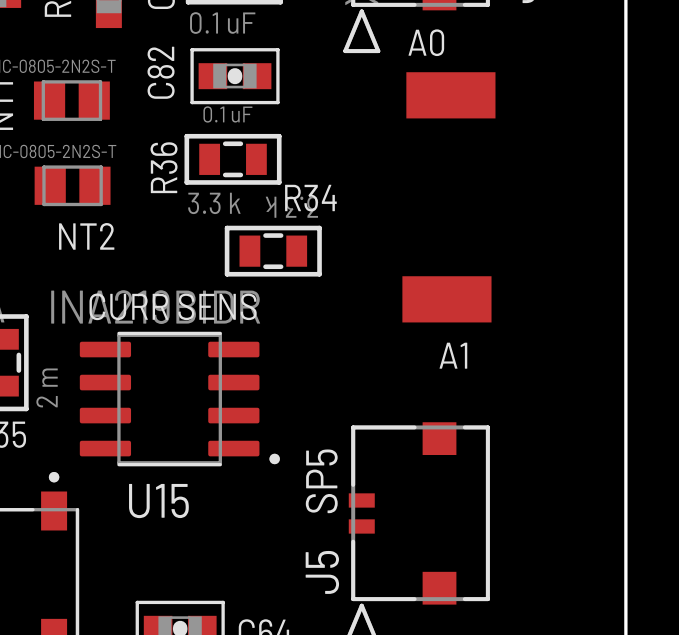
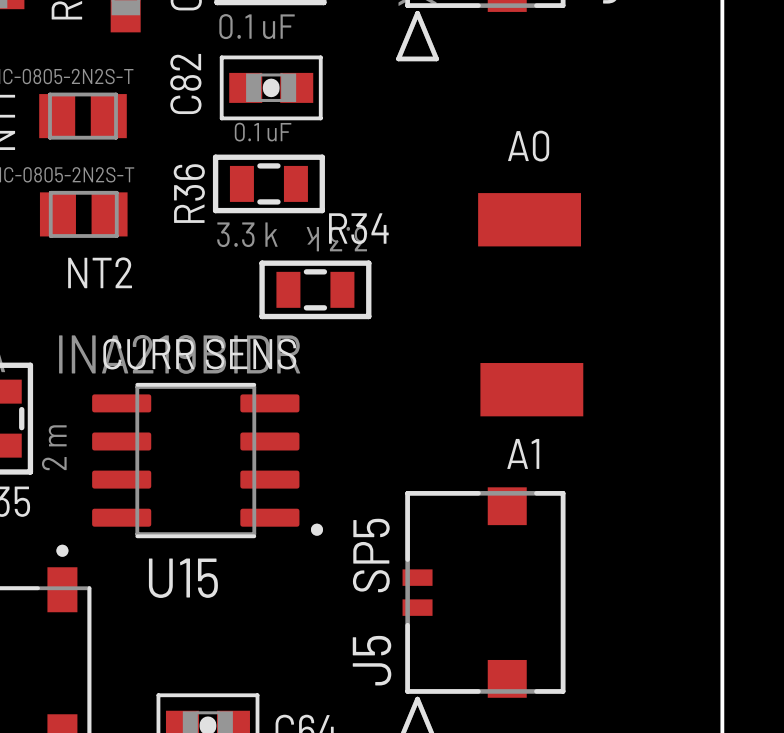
text position: A0 (426, 42) -> A0 (528, 146)
part: (450, 95) -> none
part: none -> (529, 219)
part position: (446, 299) -> (531, 389)
text position: A1 (453, 355) -> A1 (523, 453)

